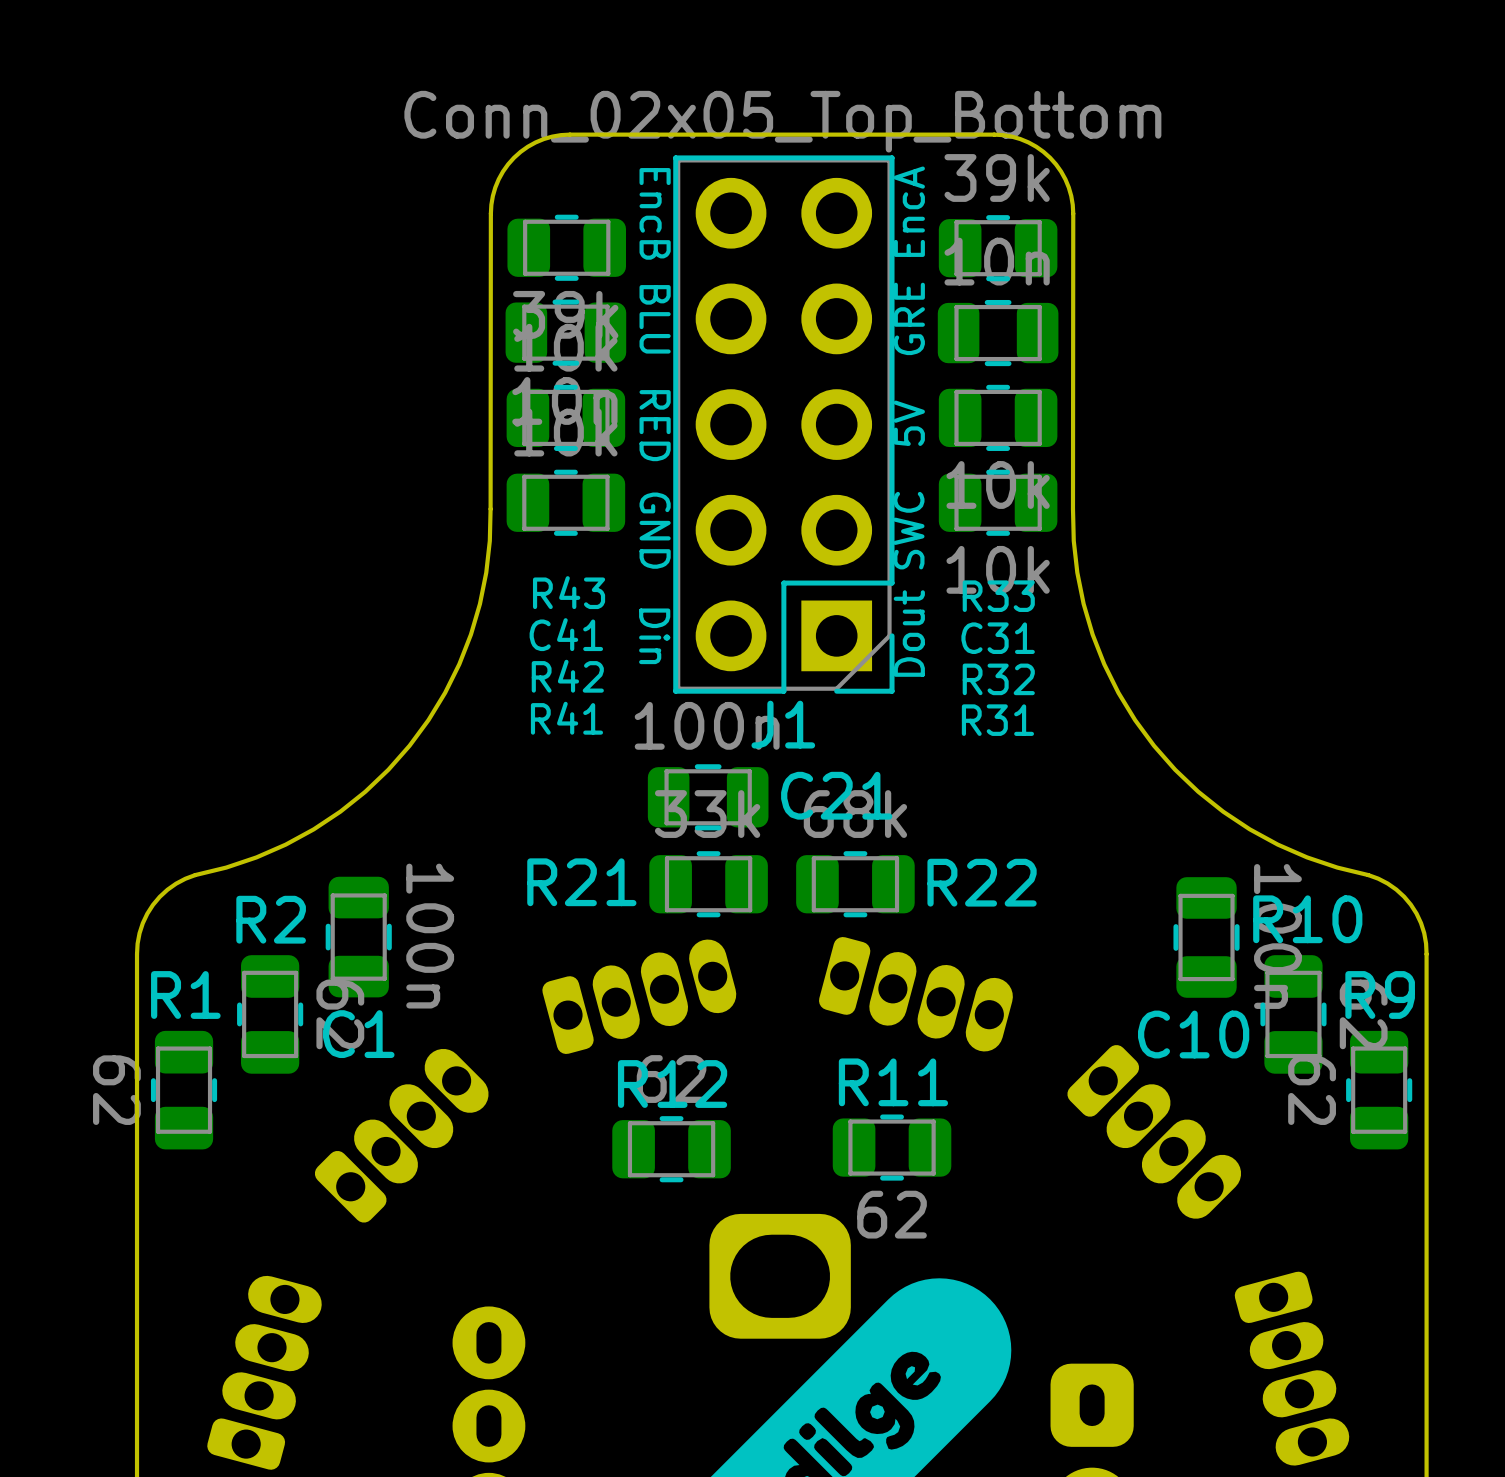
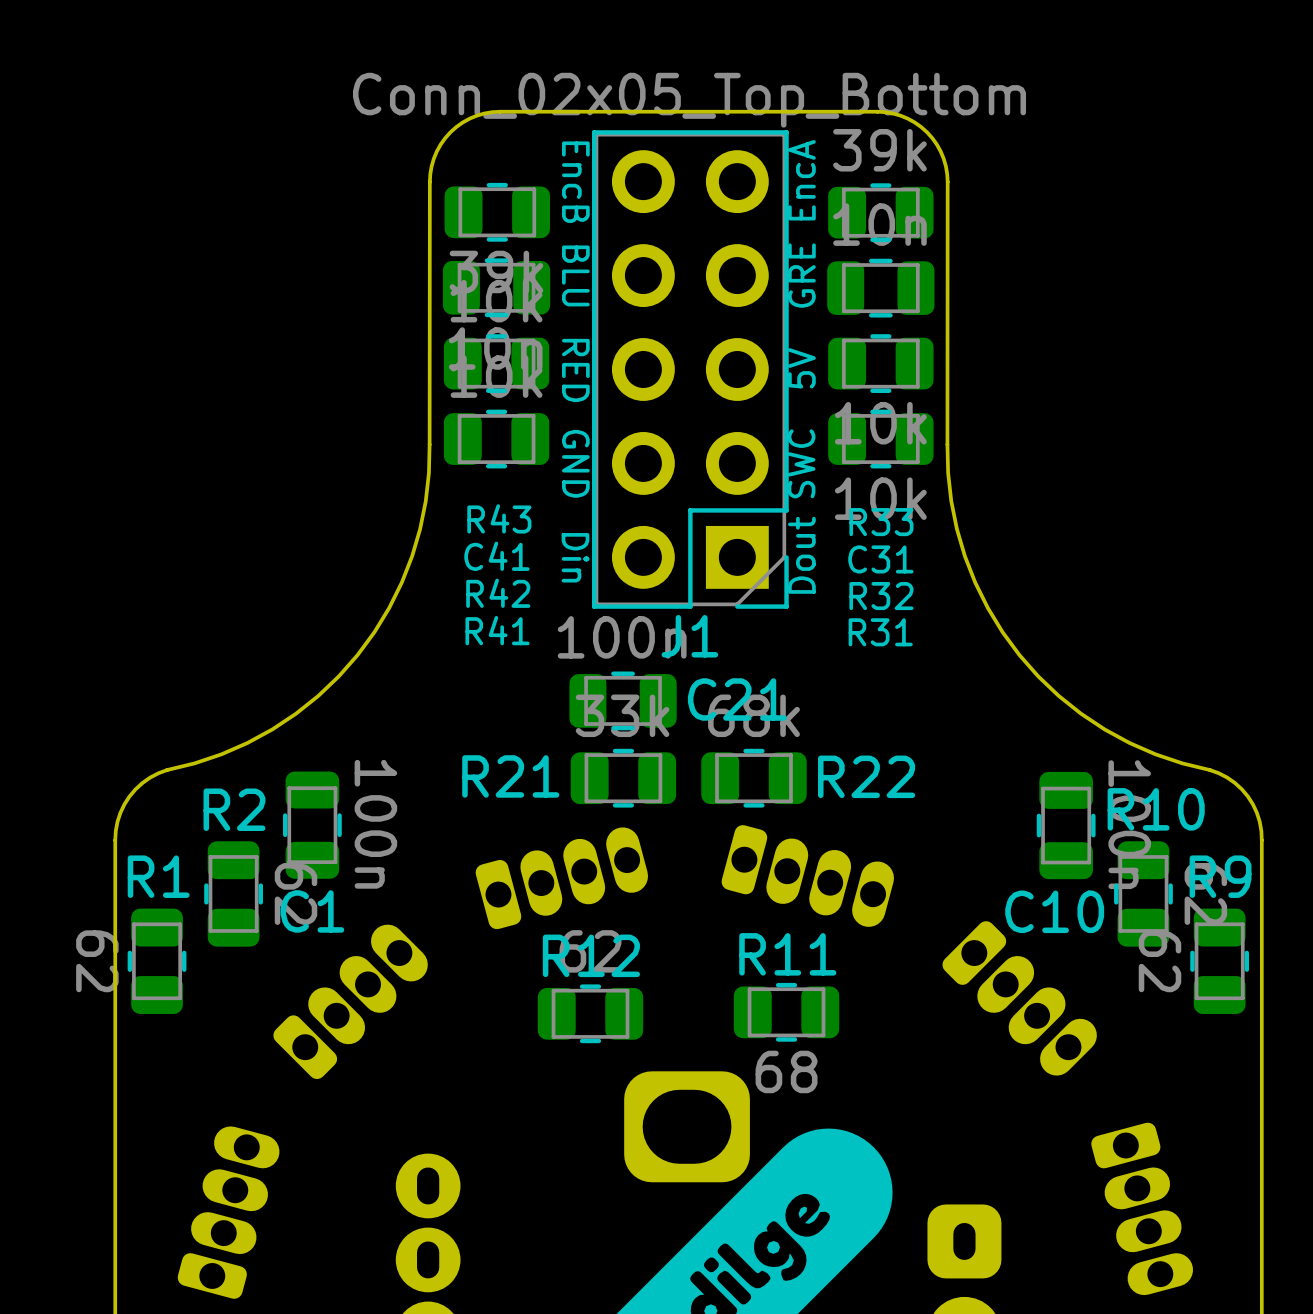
R11 value: 62 (892, 1214) -> 68 (786, 1071)

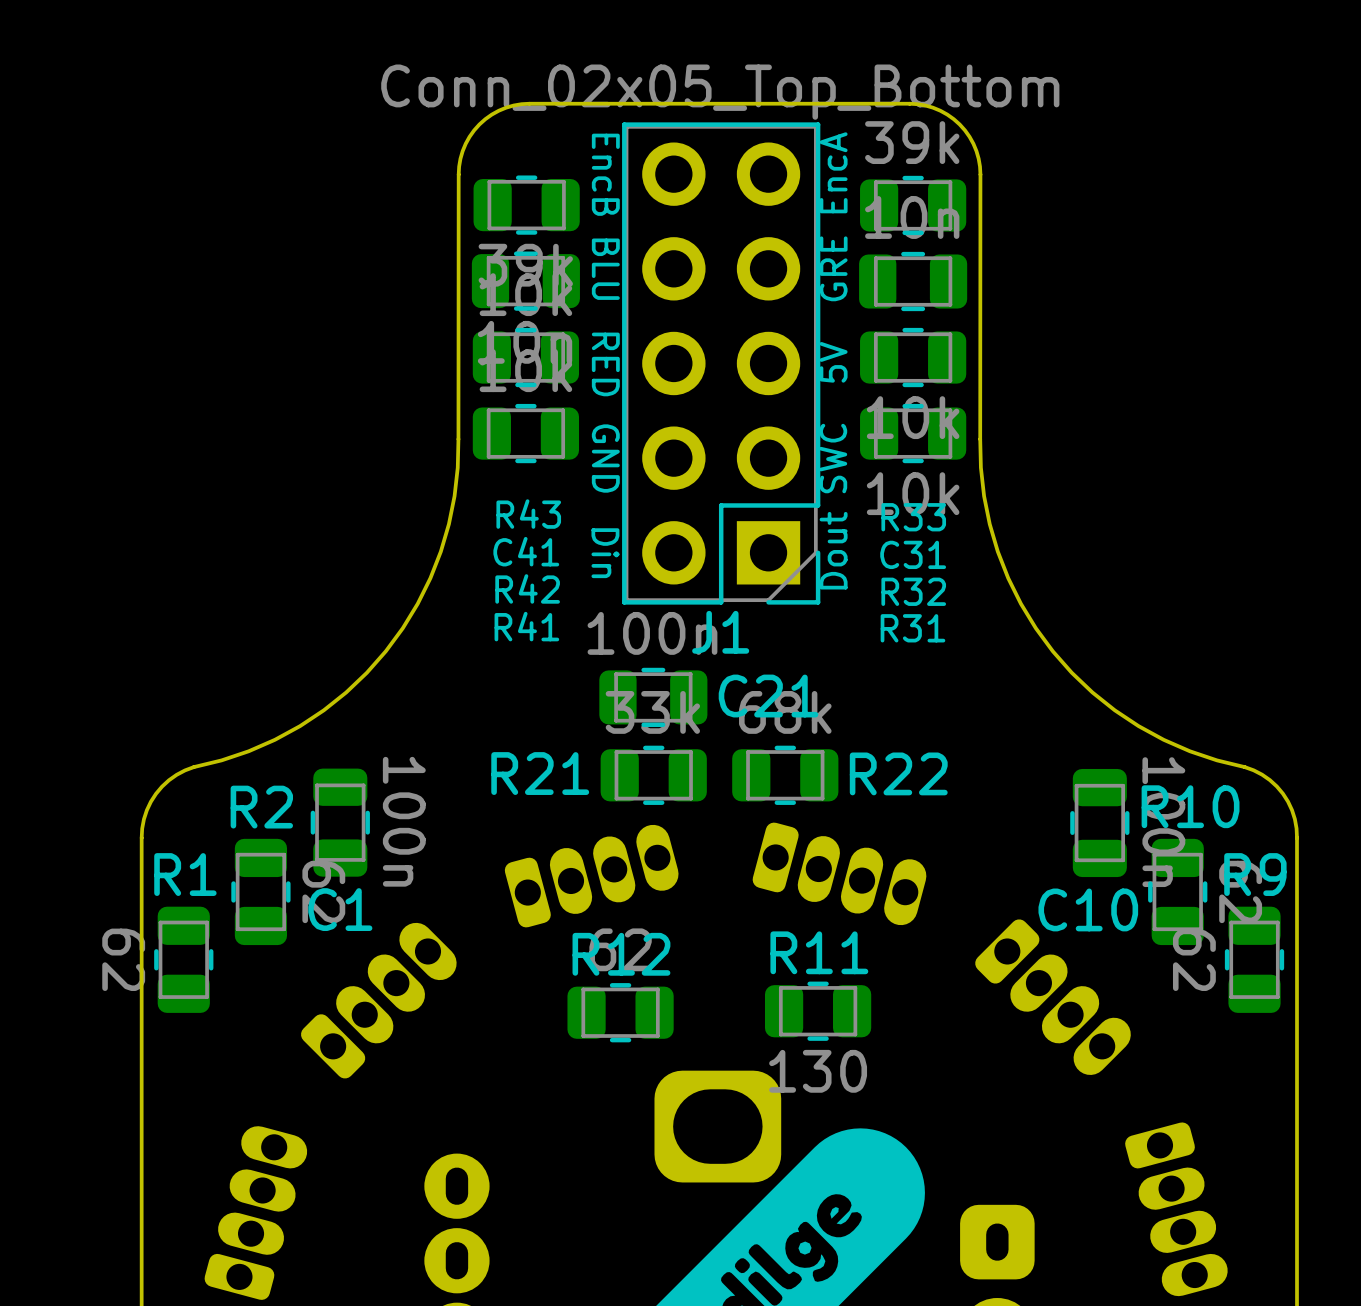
R11 value: 68 (786, 1071) -> 130 (818, 1071)

